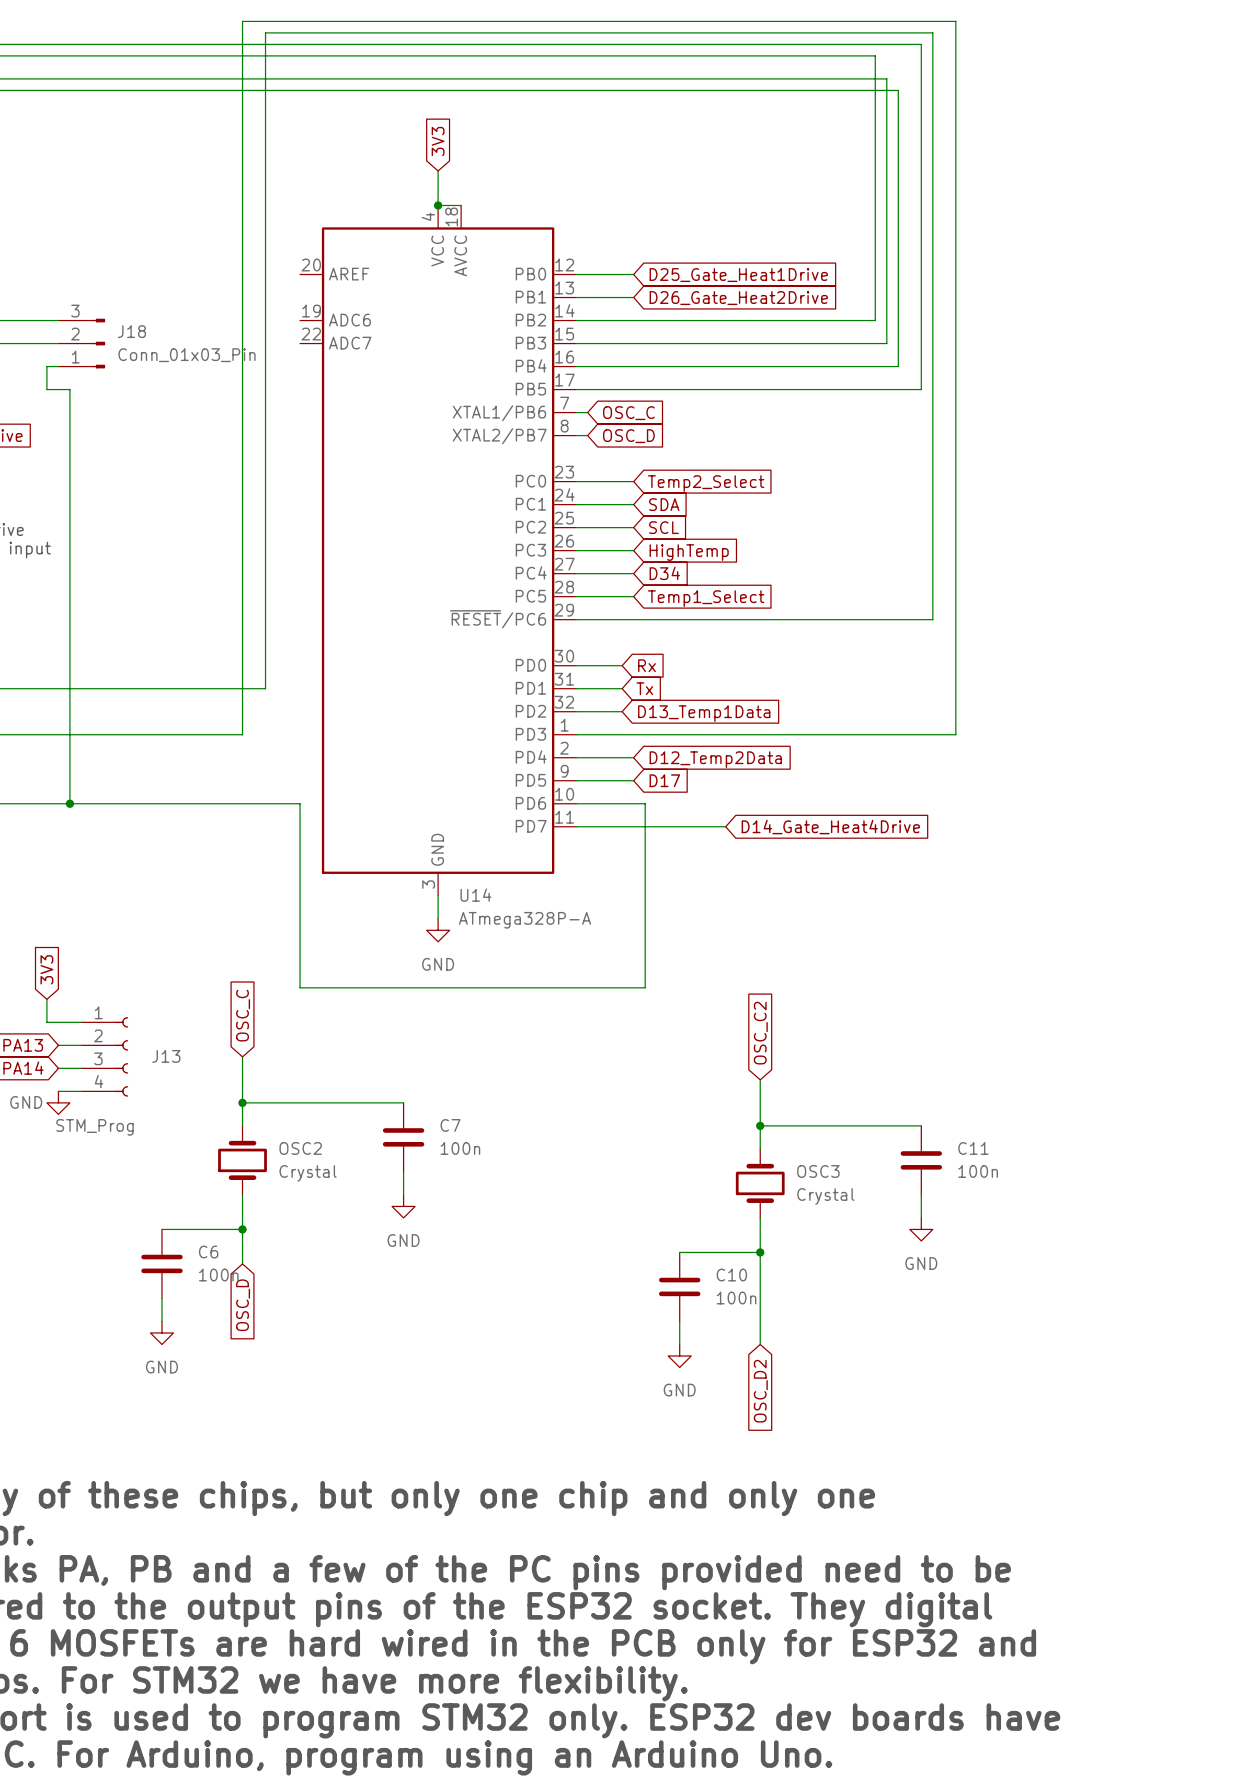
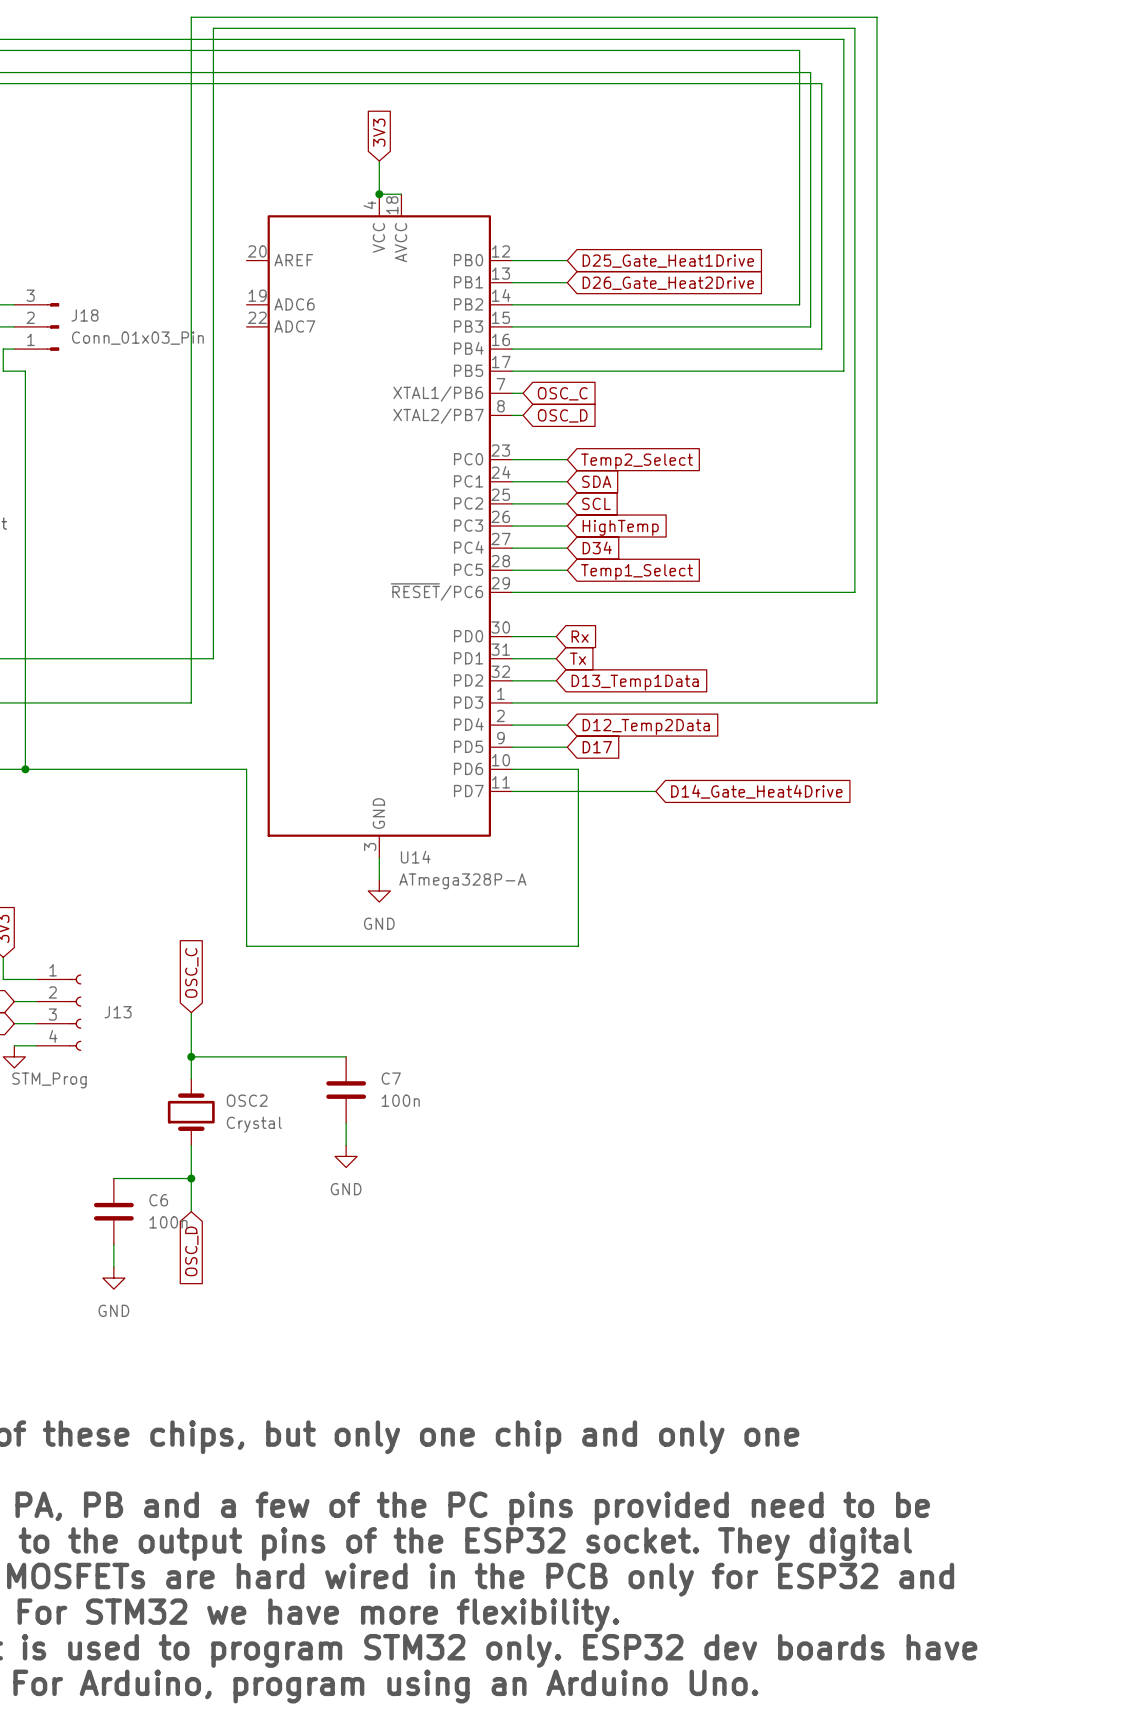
global label: OSC_C2 (760, 1033) -> none
wire: (760, 1079) (760, 1148) -> none
wire: (760, 1125) (921, 1125) -> none
junction: (760, 1125) -> none
C11: 100n (921, 1160) -> none
OSC3: Crystal (760, 1183) -> none
wire: (921, 1194) (921, 1217) -> none
wire: (760, 1217) (760, 1344) -> none
power symbol: GND (921, 1229) -> none
wire: (679, 1252) (760, 1252) -> none
junction: (760, 1252) -> none
C10: 100n (679, 1286) -> none
wire: (679, 1321) (679, 1344) -> none
power symbol: GND (679, 1355) -> none
global label: OSC_D2 (760, 1391) -> none

